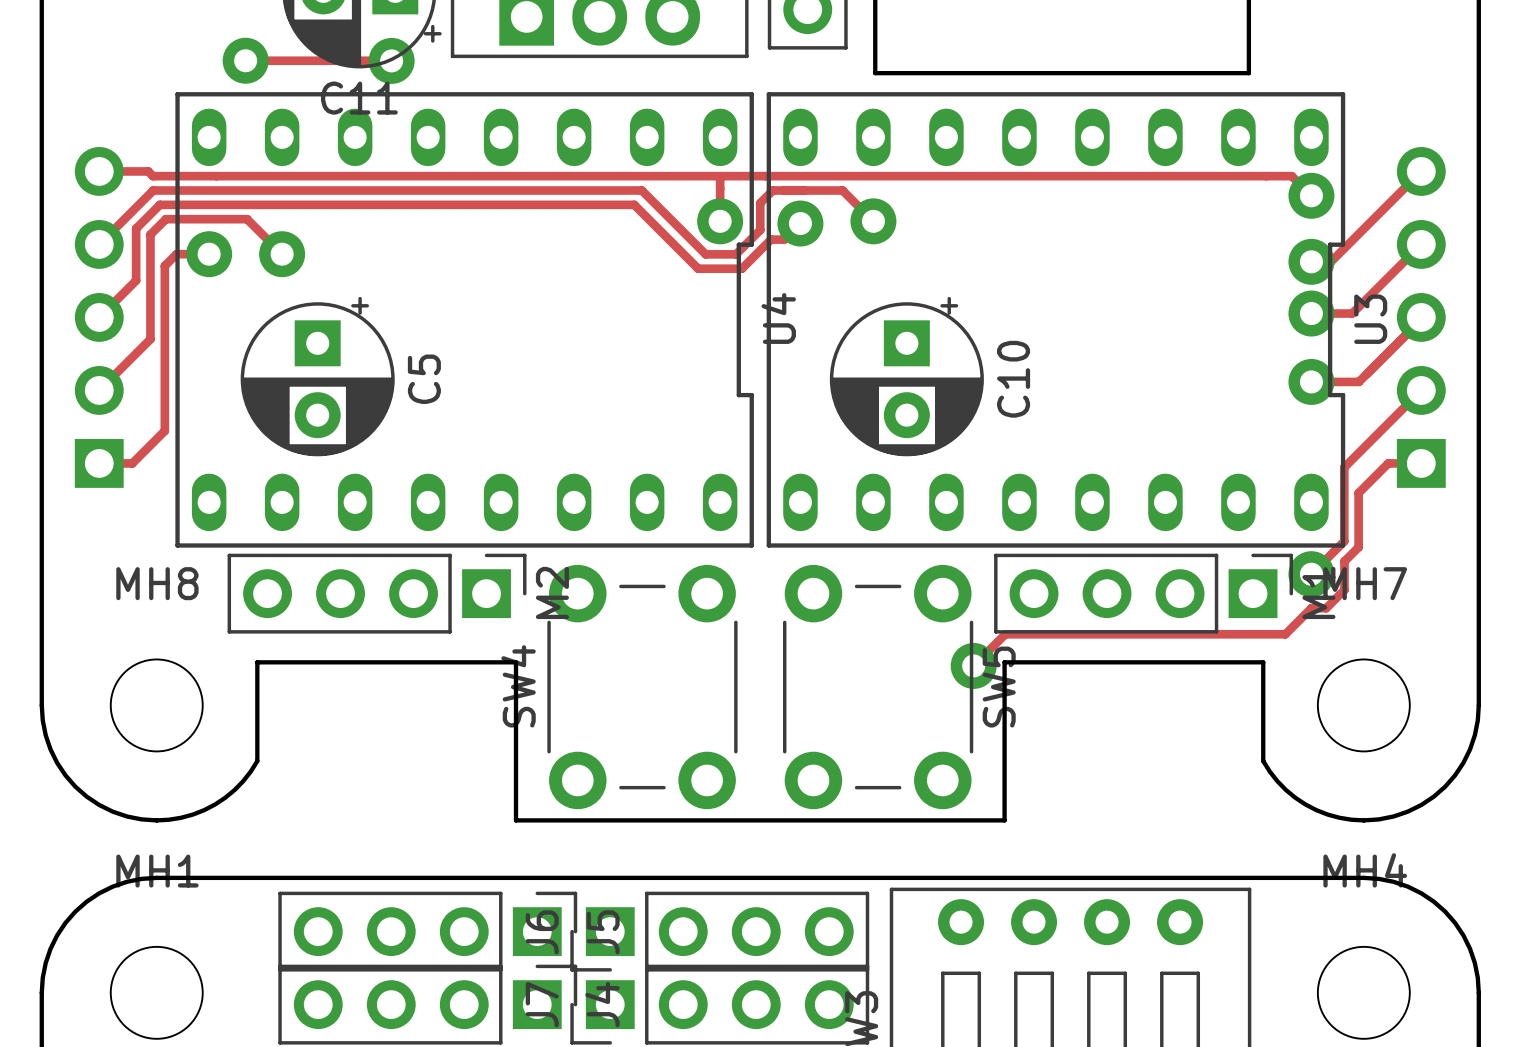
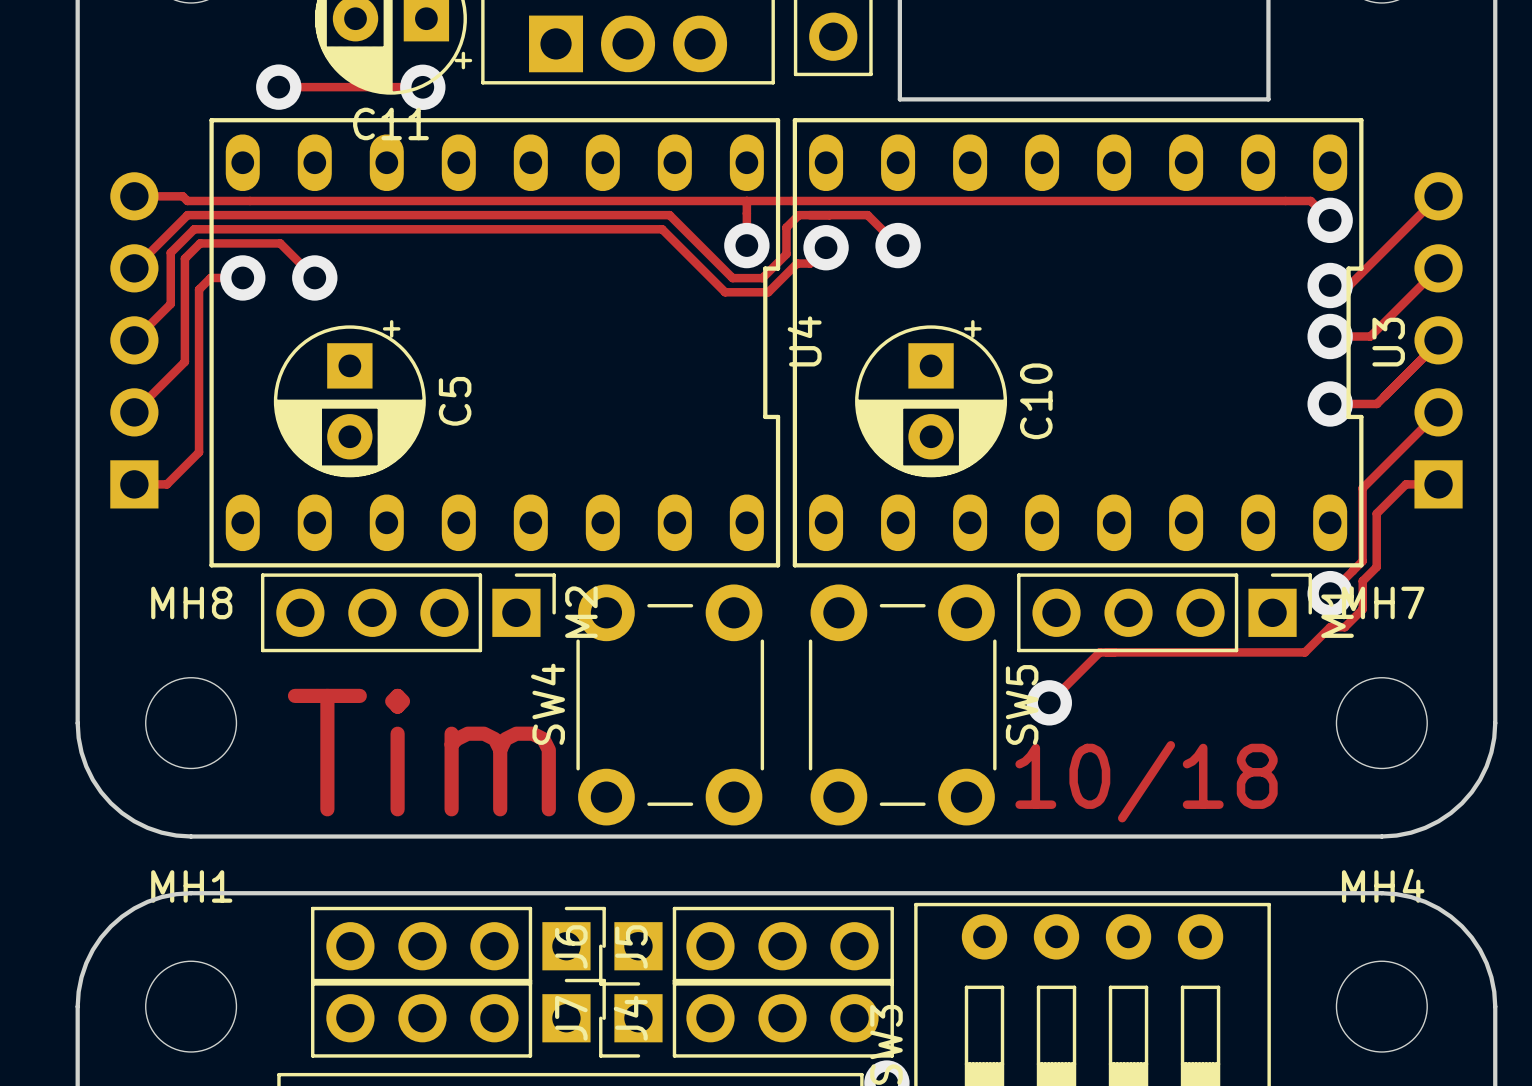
track: (1285, 633) (1005, 634) (973, 665) -> (1304, 652) (1099, 652) (1049, 702)
via position: (973, 665) -> (1049, 702)
text: none -> Tim (421, 752)
text: none -> 10/18 (1146, 781)
board edge: (156, 820) (181, 817) (204, 810) (234, 789) (250, 771) (257, 761) (257, 662) (516, 662) (516, 820) -> (191, 836) (545, 836)
board edge: (1004, 820) (1004, 662) (1263, 662) (1263, 761) (1269, 771) (1285, 789) (1305, 804) (1339, 817) (1363, 820) -> (1027, 836) (1381, 836)

